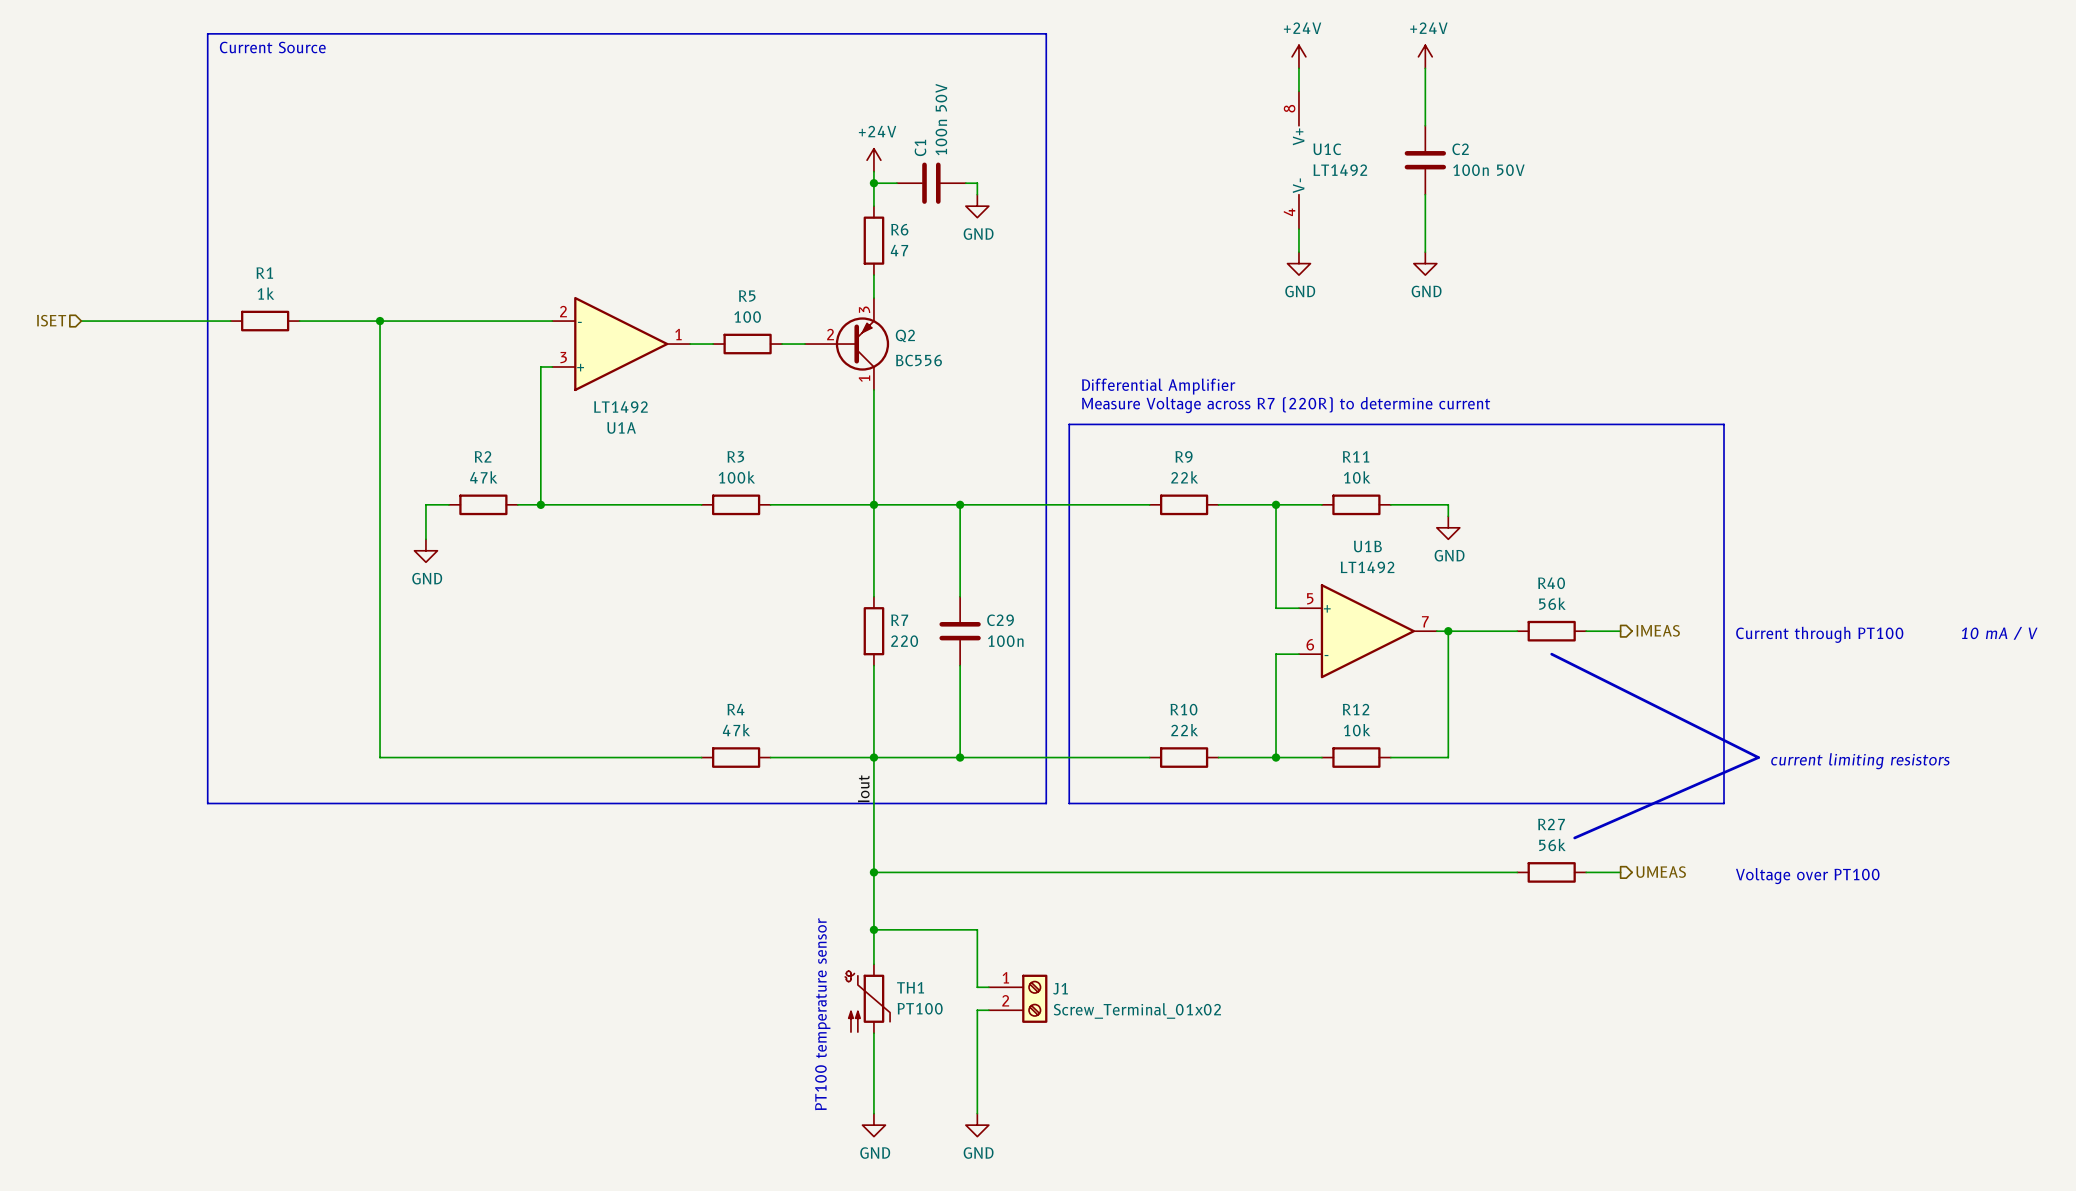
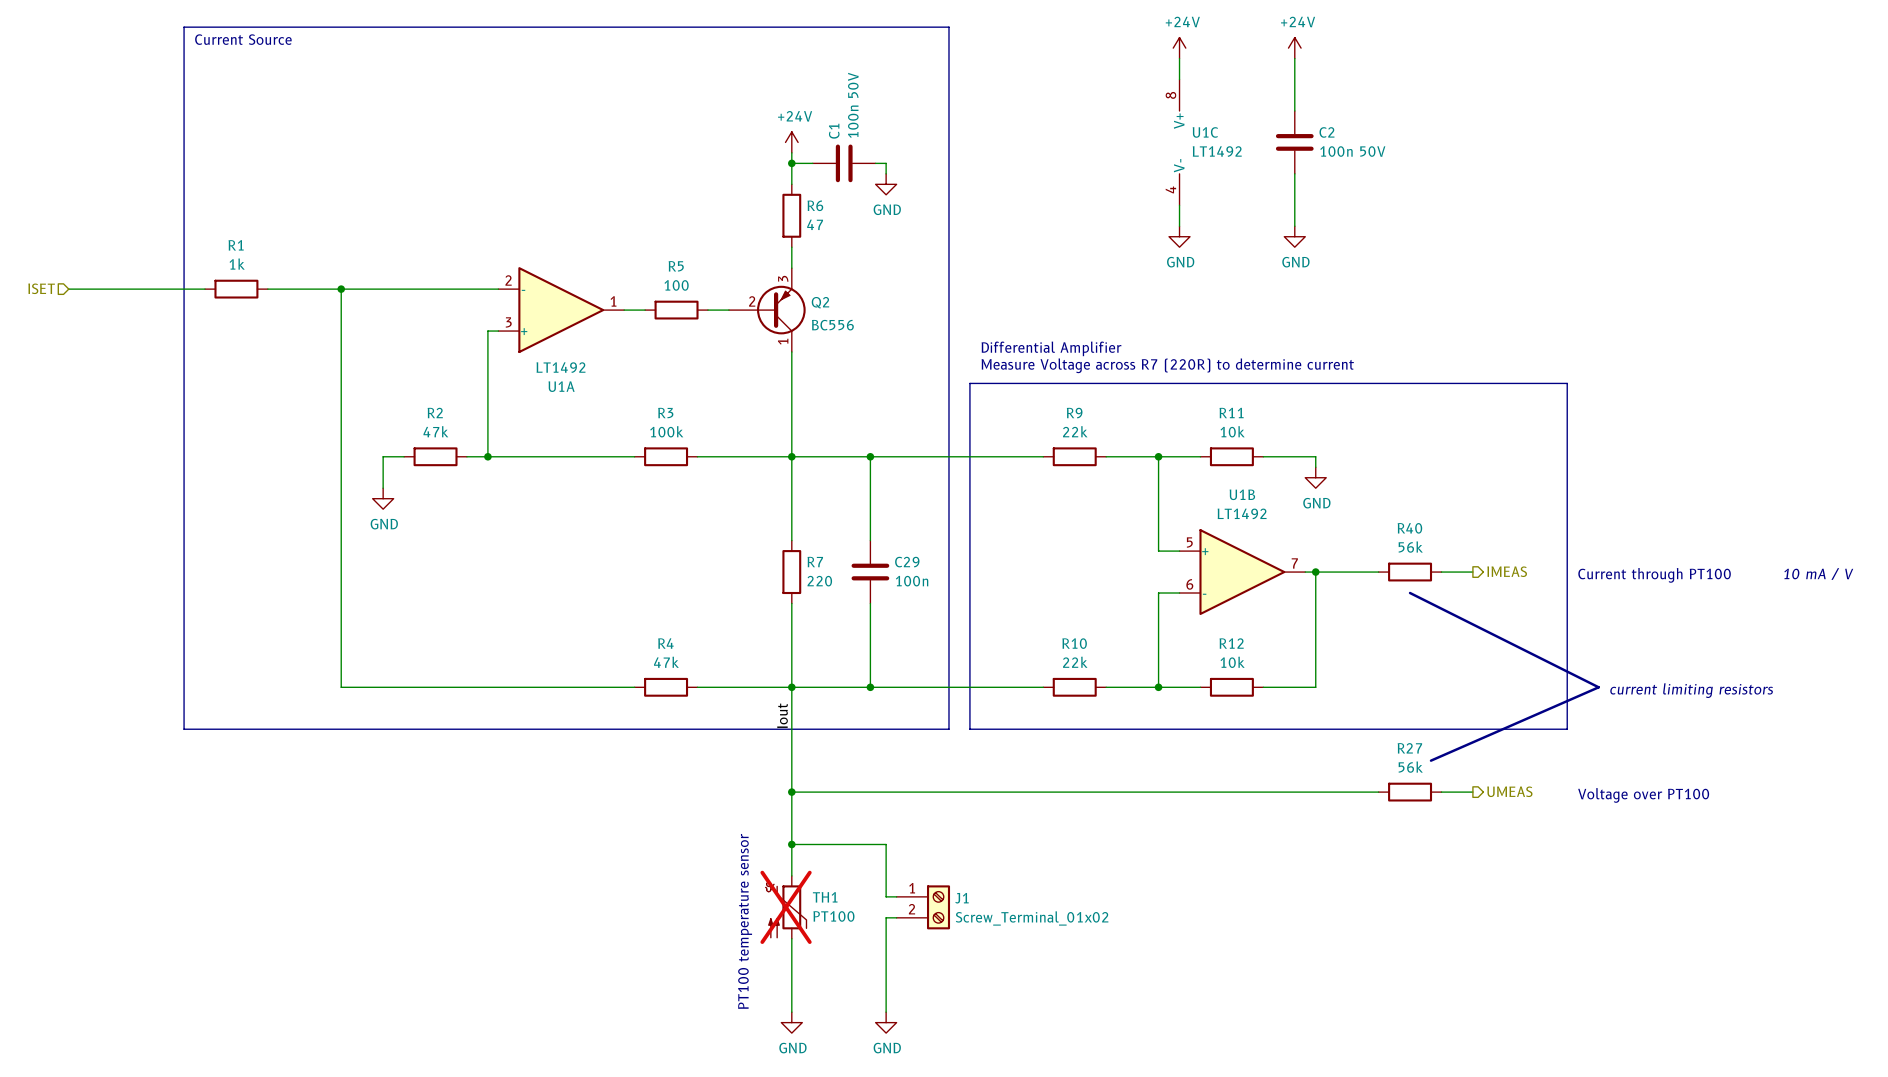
TH1 do-not-place cross: none -> (786, 907)

